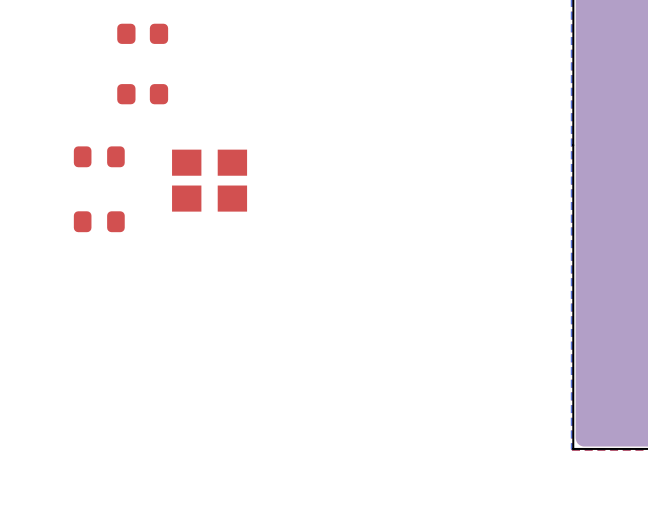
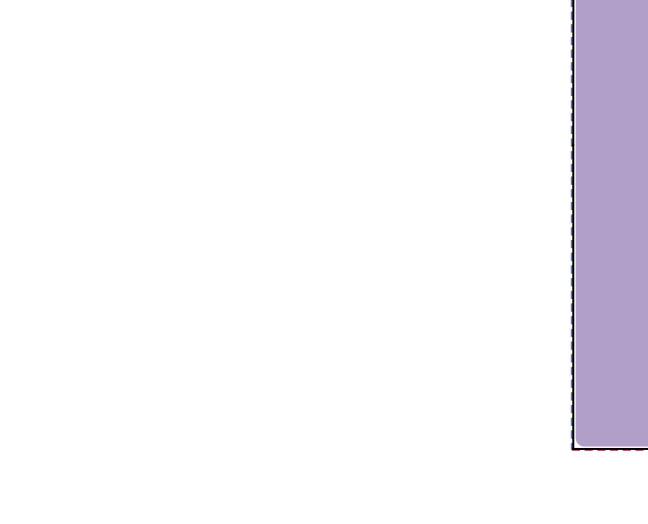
part: (142, 33) -> none
part: (142, 94) -> none
part: (99, 156) -> none
part: (209, 180) -> none
part: (99, 221) -> none

